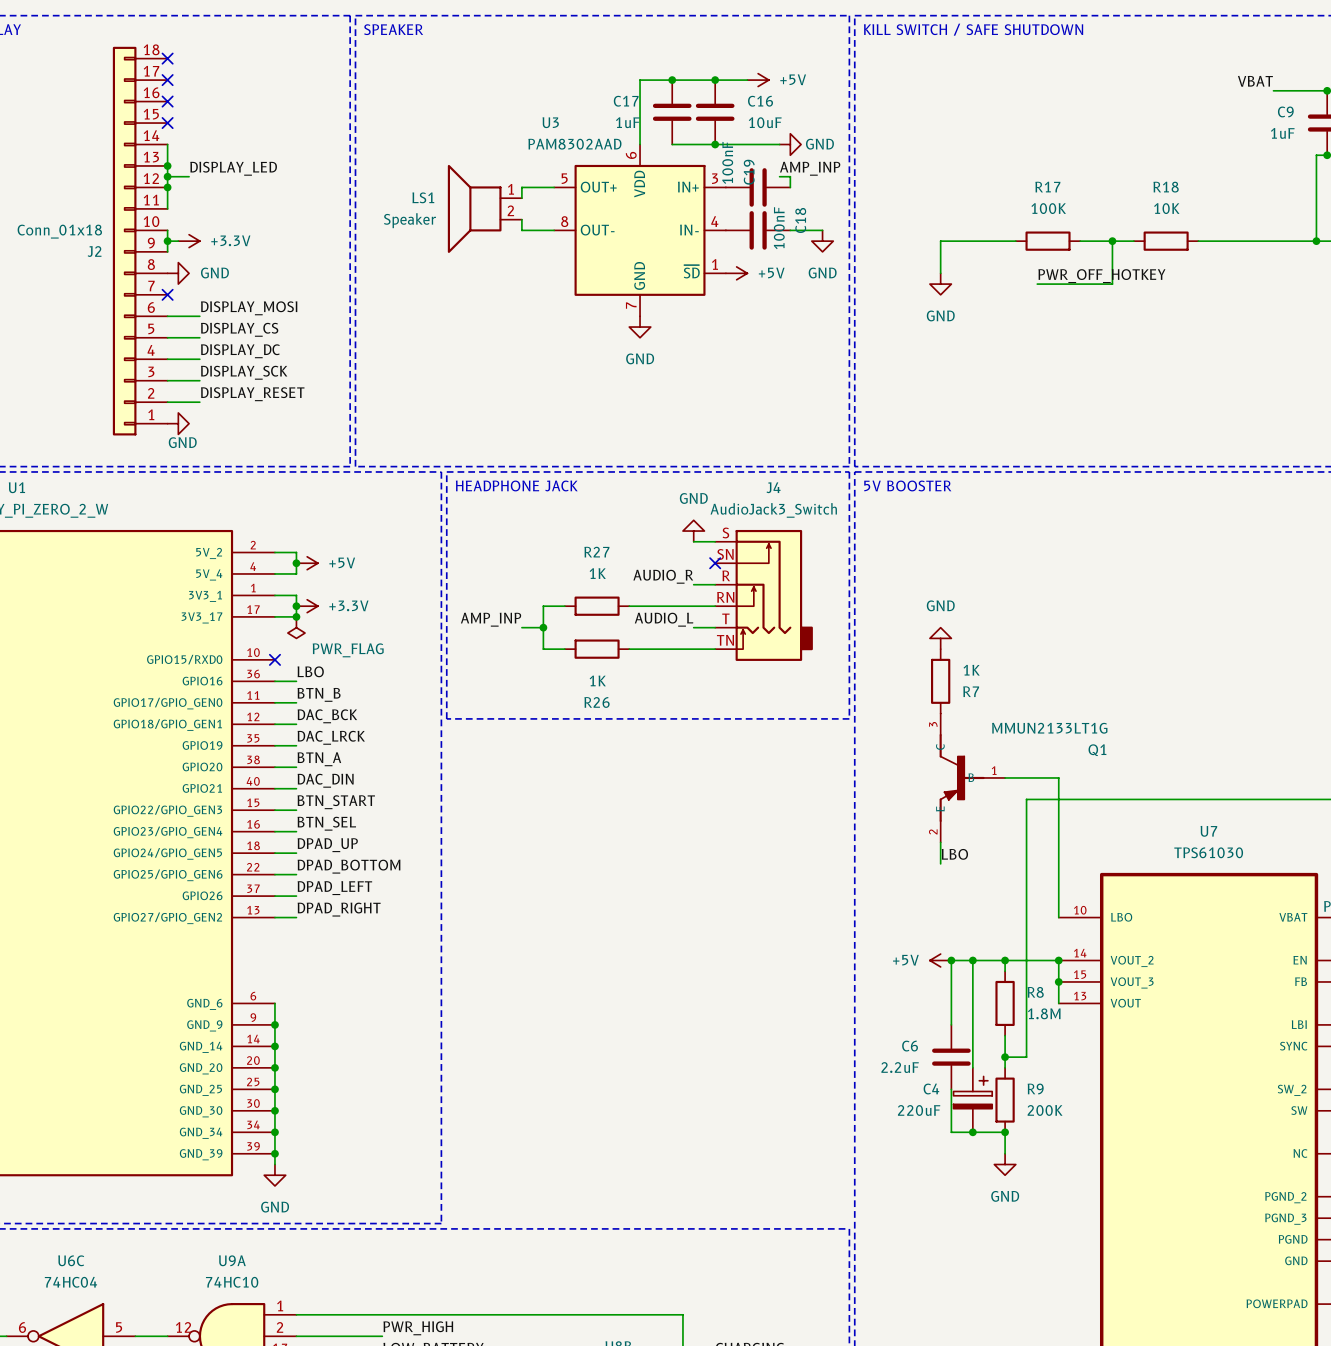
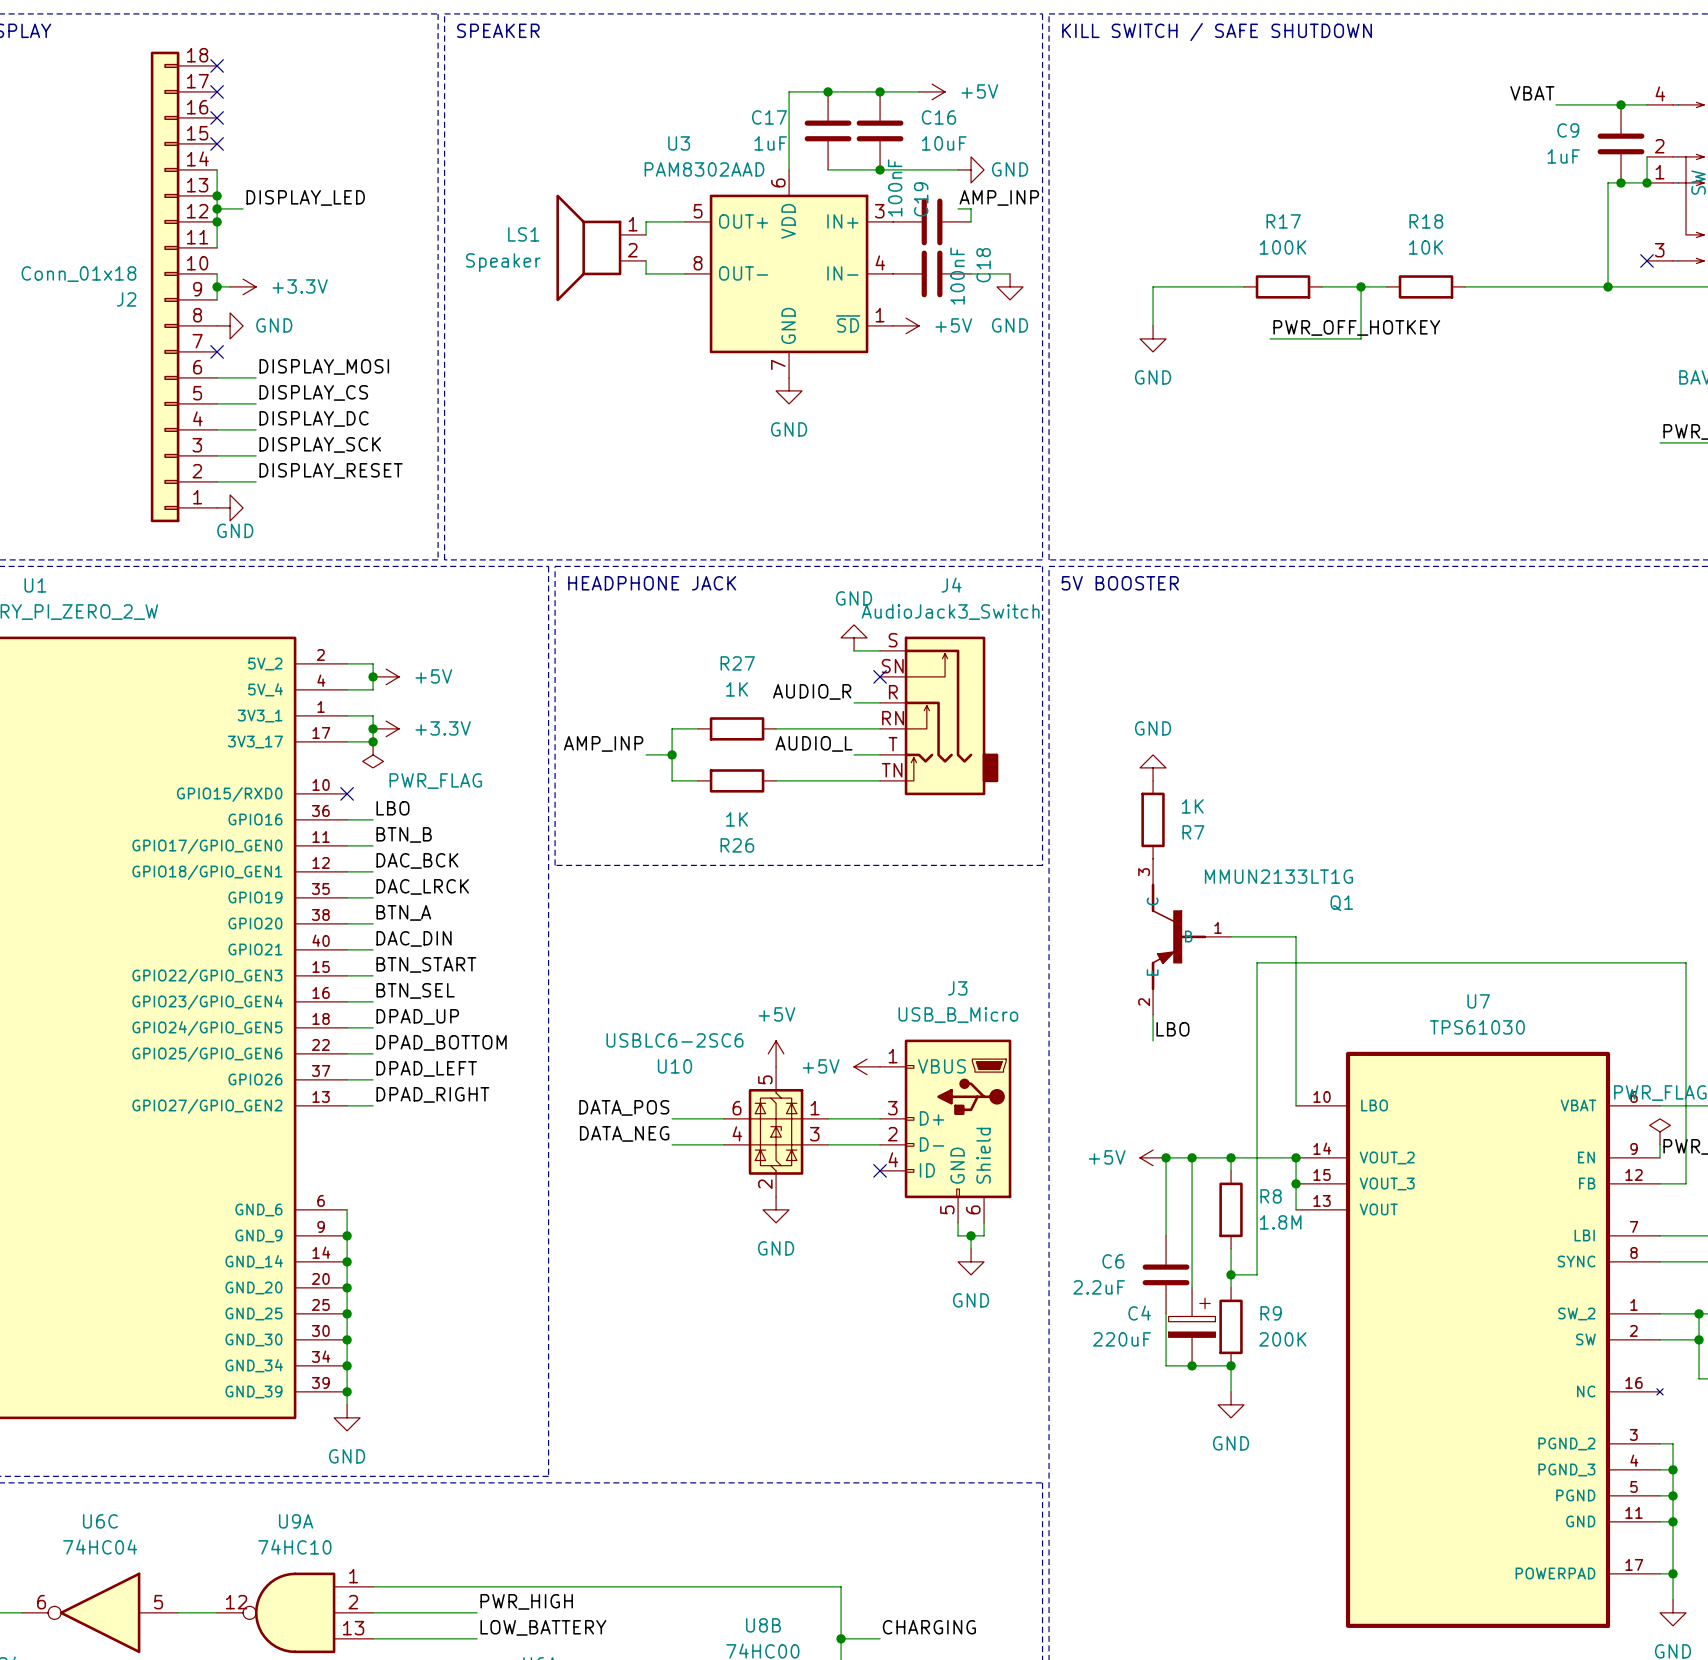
power symbol: none -> +5V (776, 1053)
power symbol: none -> +5V (867, 1066)
label: none -> DATA_POS (624, 1107)
wire: none -> (672, 1118) (724, 1118)
wire: none -> (828, 1118) (880, 1118)
J3: none -> USB_B_Micro (945, 1131)
U10: none -> USBLC6-2SC6 (776, 1131)
label: none -> DATA_NEG (624, 1133)
wire: none -> (672, 1144) (724, 1144)
wire: none -> (828, 1144) (880, 1144)
no-connect mark: none -> (880, 1170)
power symbol: none -> GND (776, 1209)
wire: none -> (958, 1222) (958, 1235) (984, 1235) (984, 1222)
wire: none -> (971, 1235) (971, 1248)
junction: none -> (971, 1235)
power symbol: none -> GND (971, 1261)

